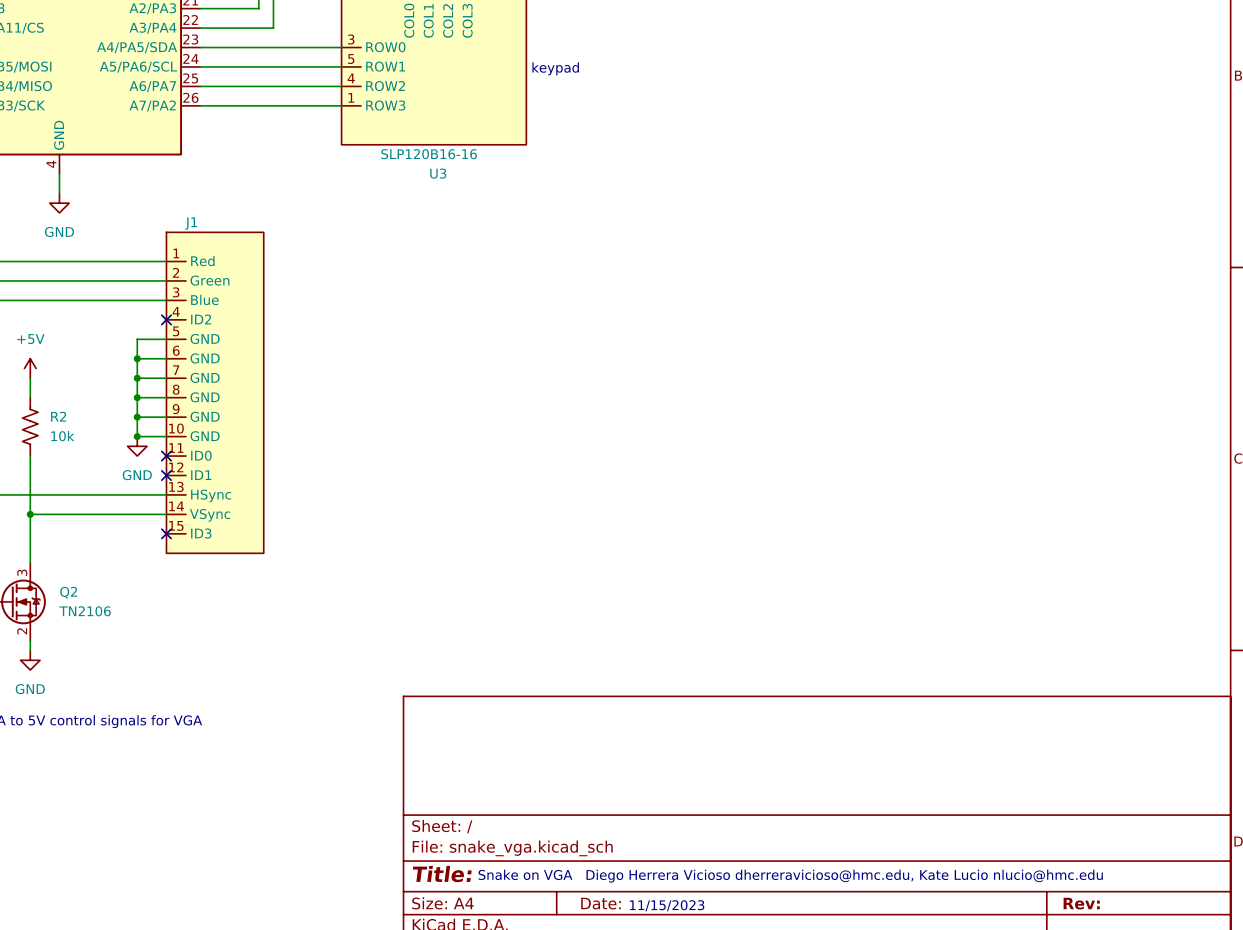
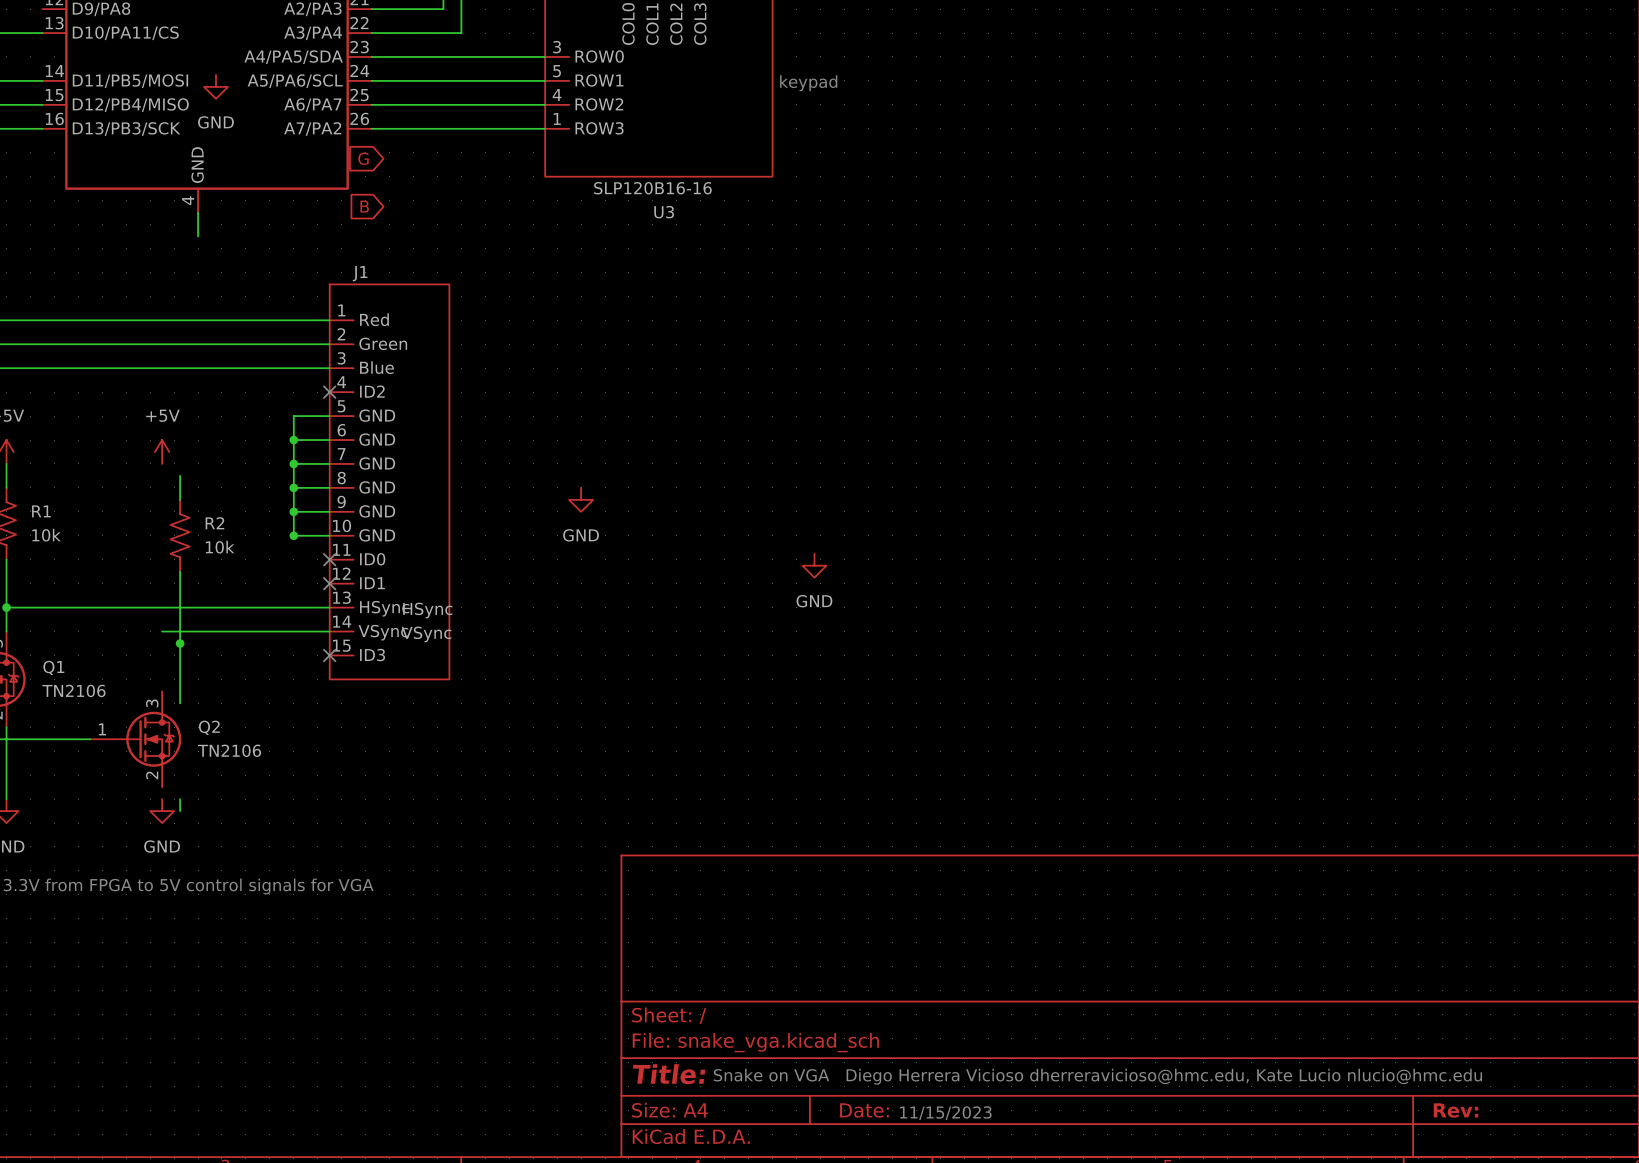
global label: none -> G (363, 158)
global label: none -> B (364, 206)
power symbol position: GND (59, 203) -> GND (216, 86)
wire: (30, 378) (30, 397) -> (180, 475) (180, 499)
power symbol: none -> GND (581, 499)
R2 position: (30, 426) -> (180, 535)
power symbol: GND (137, 446) -> none
wire: (30, 456) (30, 563) -> (180, 571) (180, 703)
power symbol: none -> GND (814, 565)
label: none -> HSync (427, 610)
junction position: (30, 514) -> (180, 643)
label: none -> VSync (426, 634)
wire: (30, 640) (30, 650) -> (180, 799) (180, 811)

